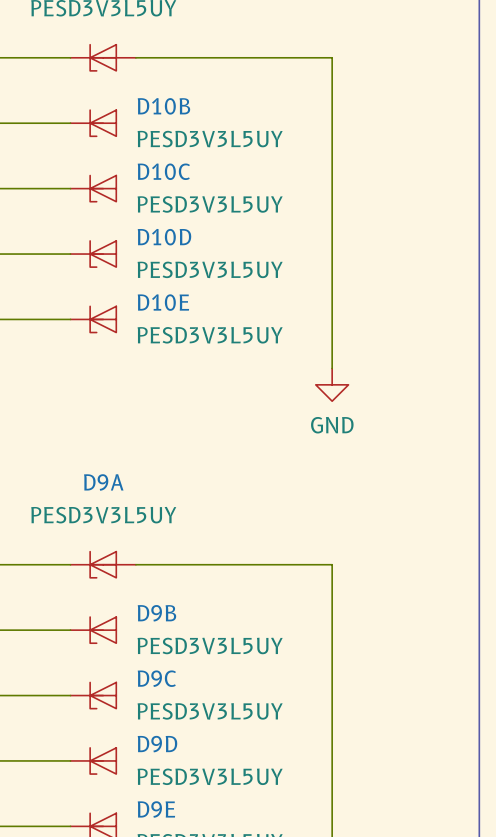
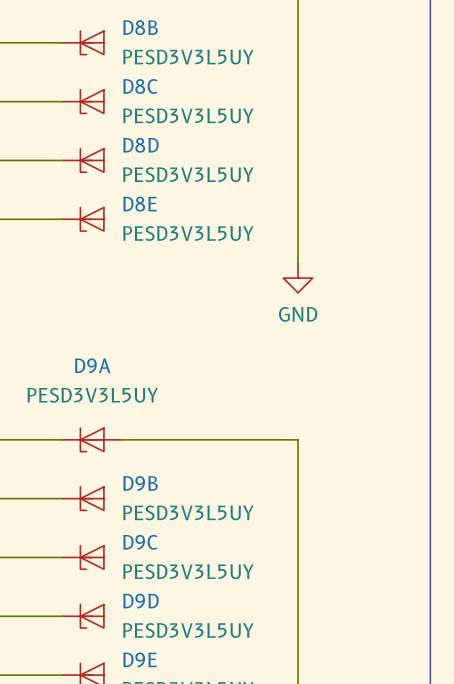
D10B name: D10B (163, 106) -> D8B (140, 27)
D10C name: D10C (163, 171) -> D8C (140, 86)
D10D name: D10D (164, 237) -> D8D (140, 145)
D10E name: D10E (163, 302) -> D8E (140, 204)

